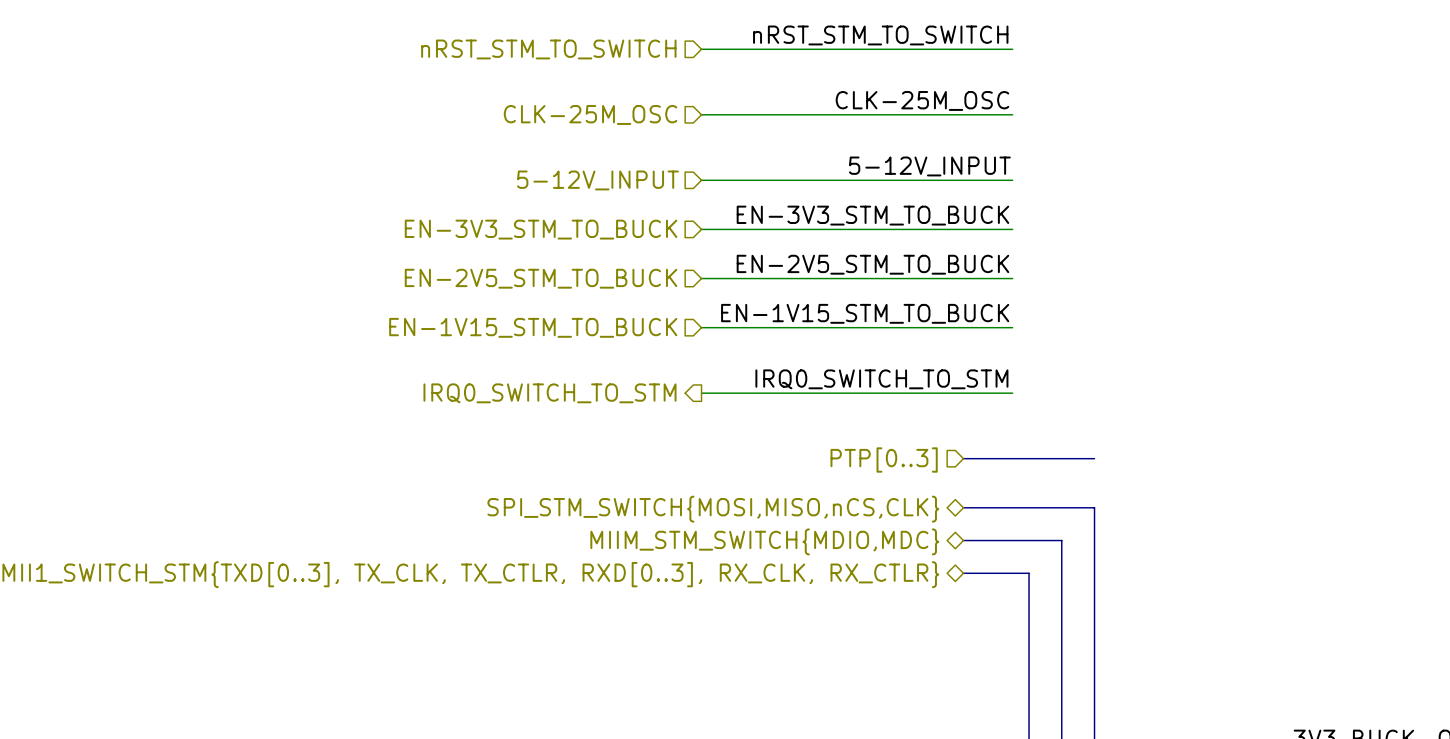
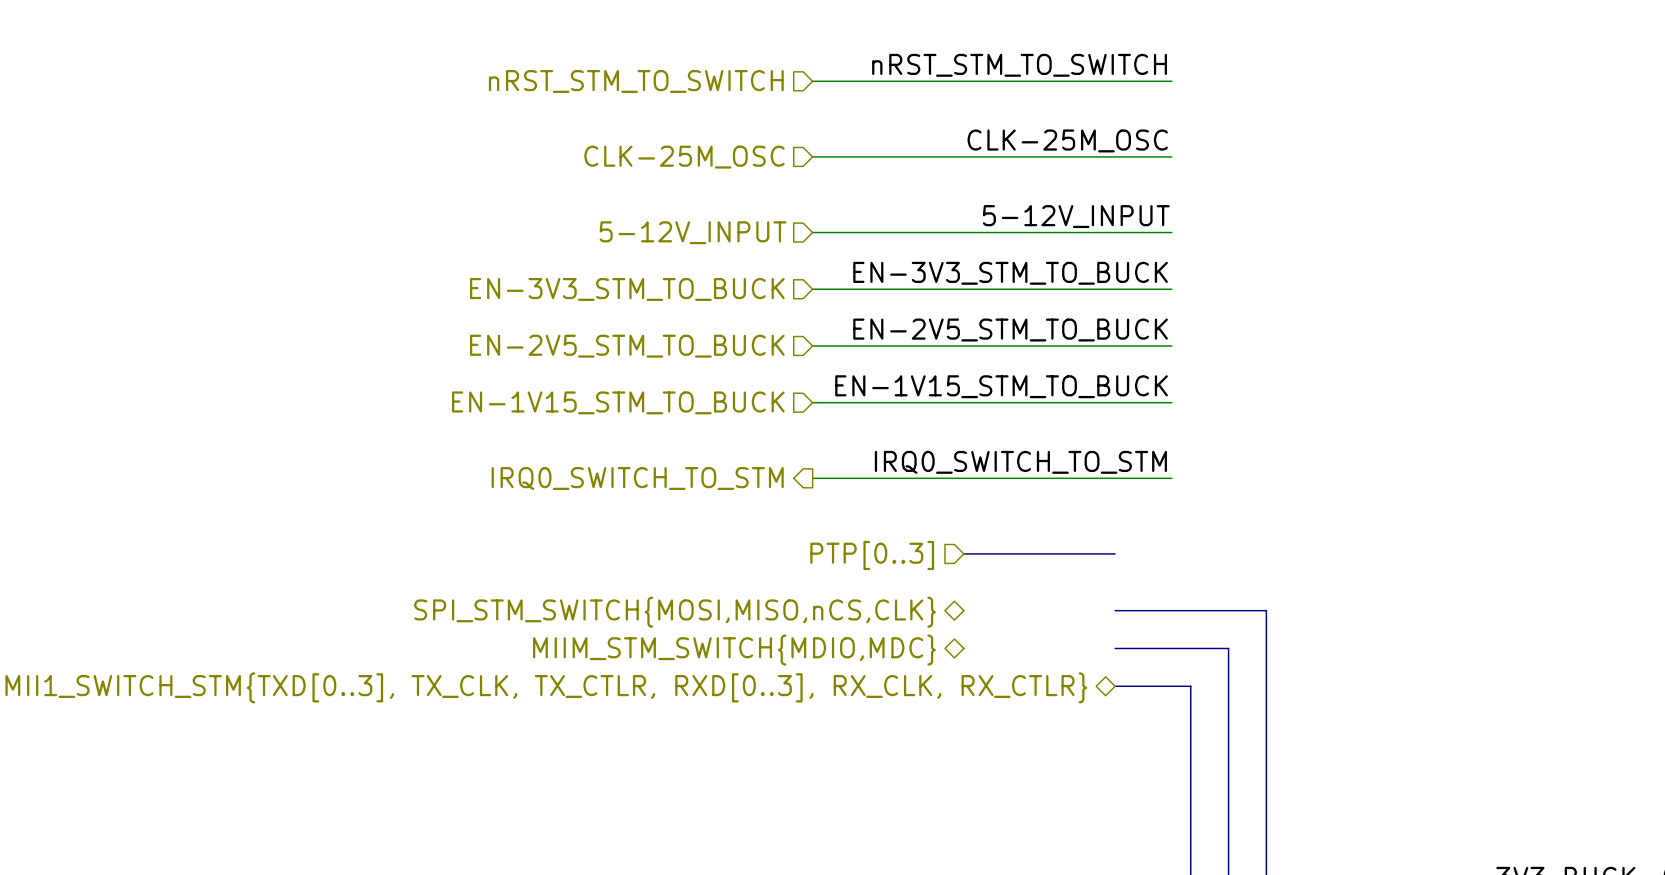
bus: (963, 458) (1094, 458) -> (1115, 553) (963, 553)
hierarchical label position: PTP[0..3] (884, 460) -> PTP[0..3] (872, 555)
hierarchical label position: SPI_STM_SWITCH{MOSI,MISO,nCS,CLK} (713, 509) -> SPI_STM_SWITCH{MOSI,MISO,nCS,CLK} (675, 612)
hierarchical label position: MIIM_STM_SWITCH{MDIO,MDC} (764, 541) -> MIIM_STM_SWITCH{MDIO,MDC} (734, 650)

